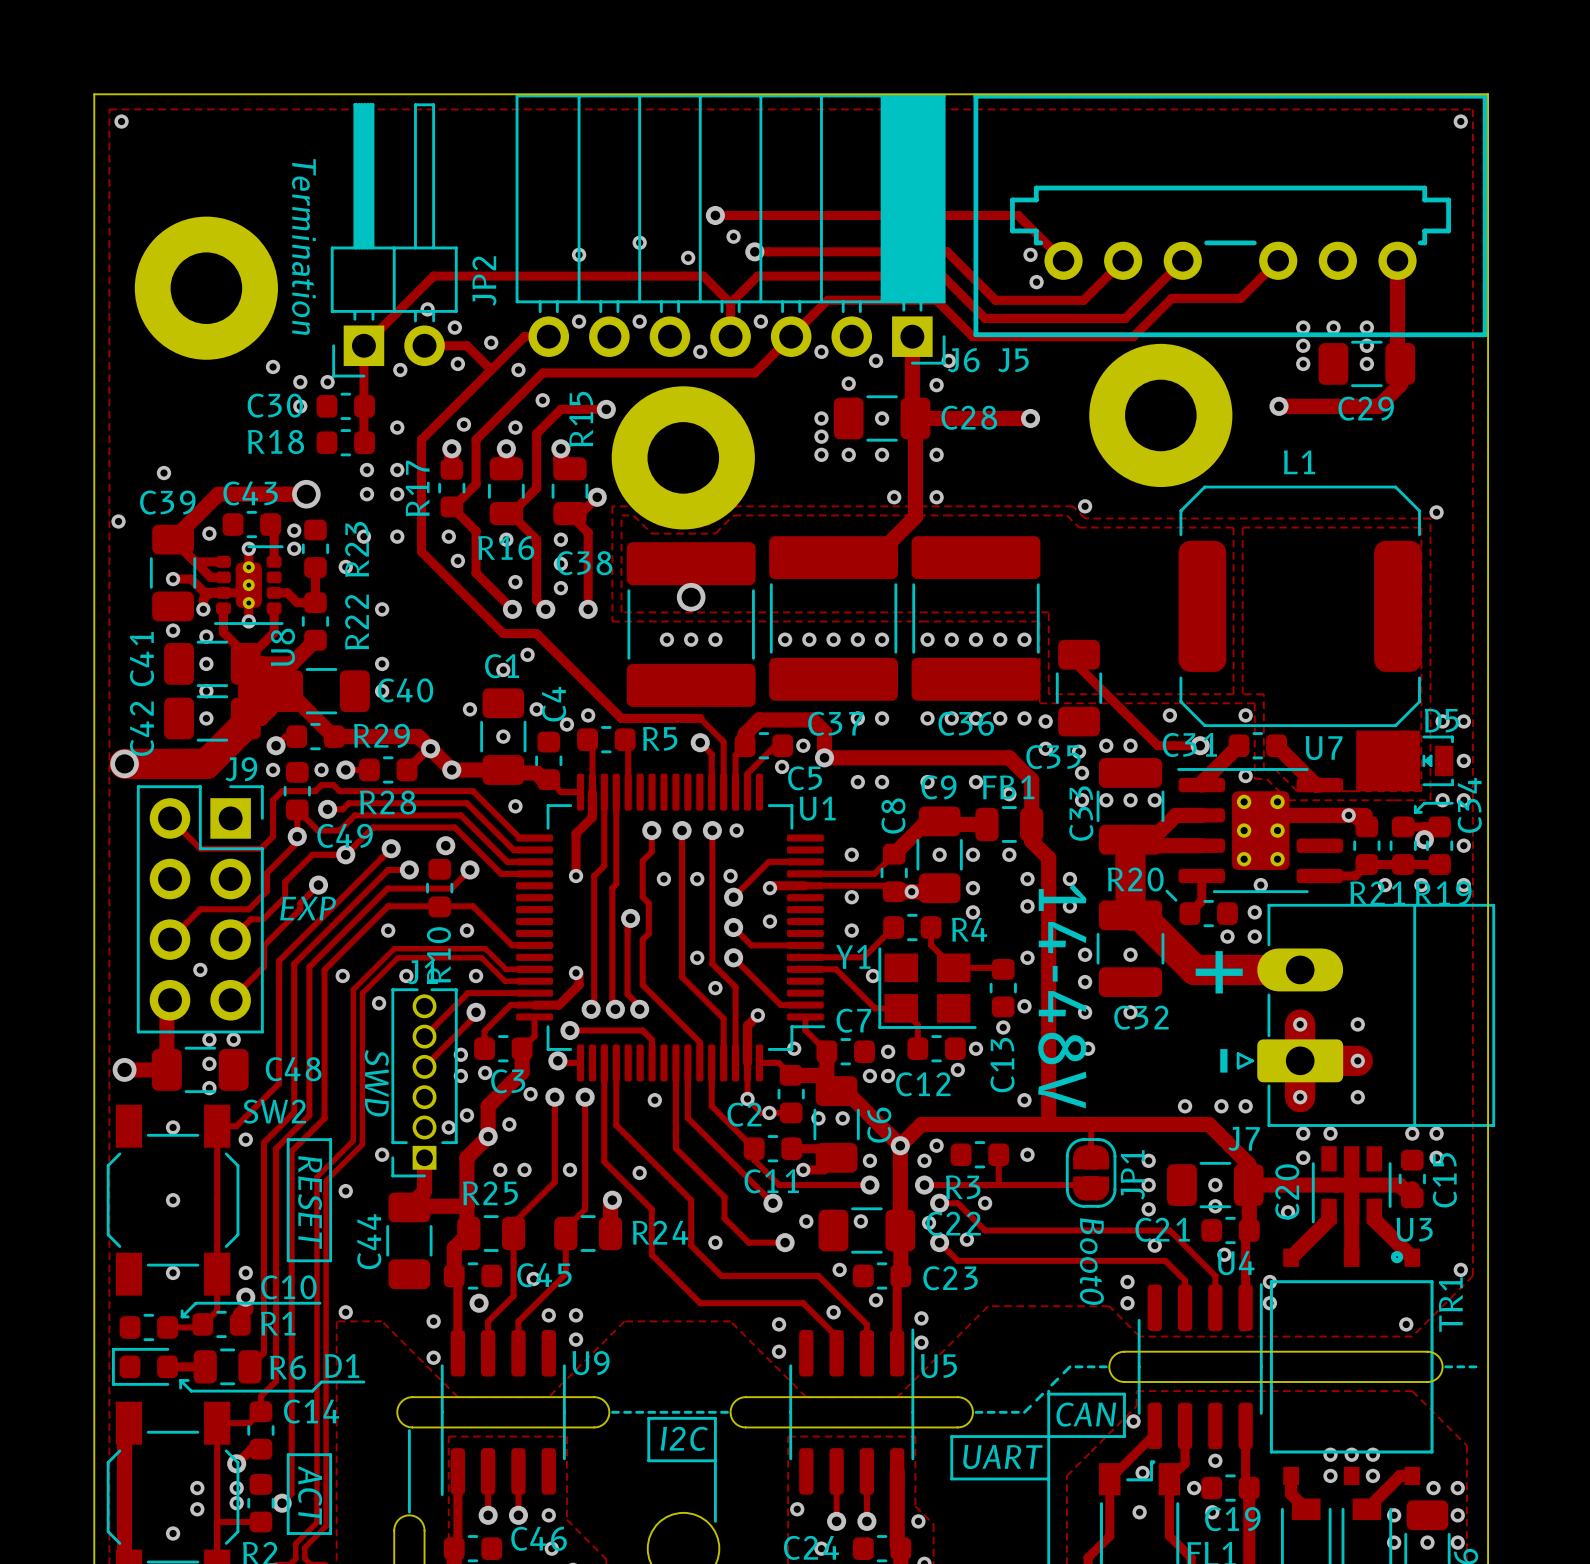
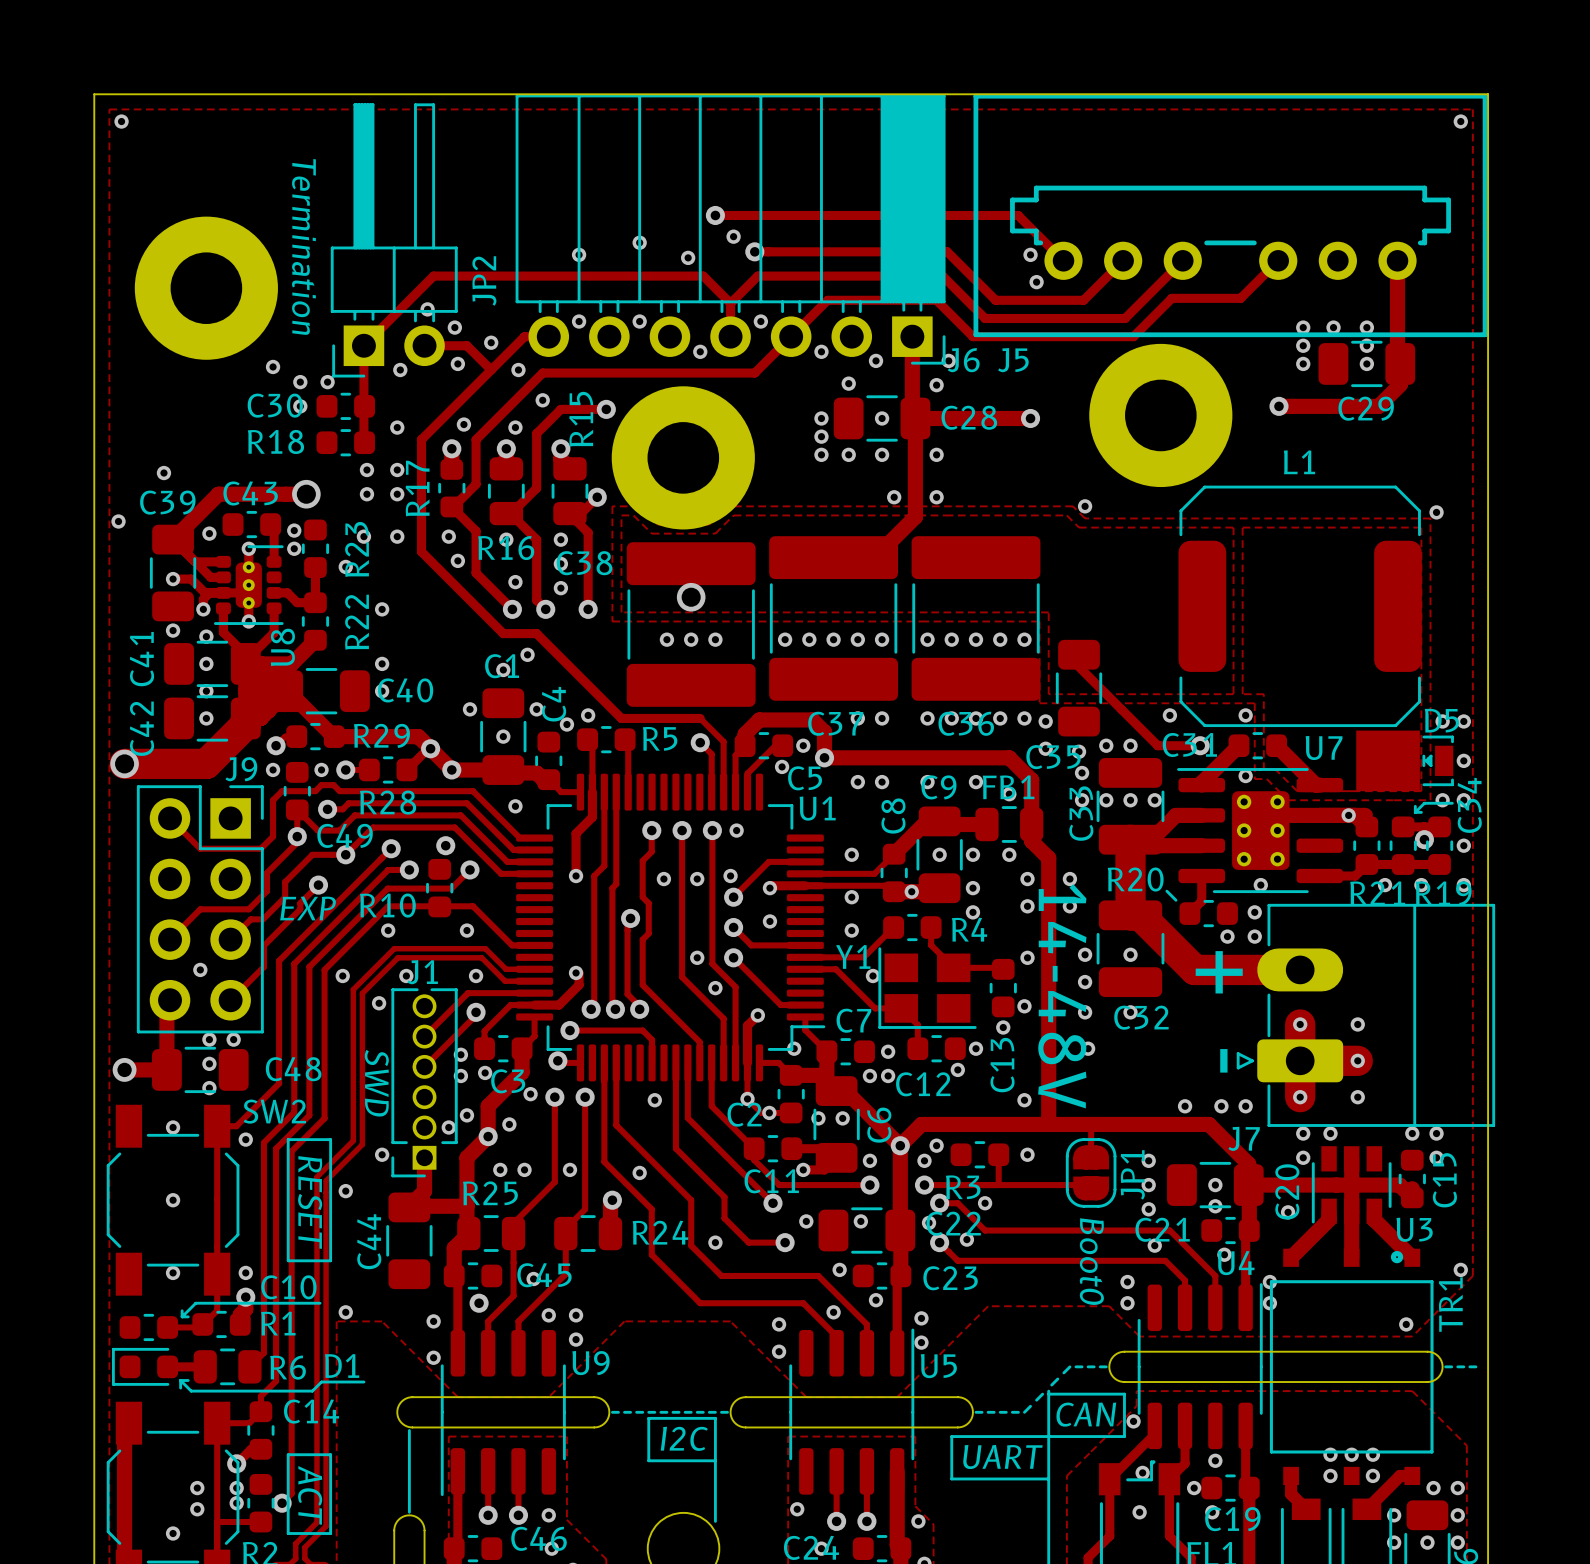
R10 name rotation: 0° (438, 955) -> 90° clockwise (387, 905)

